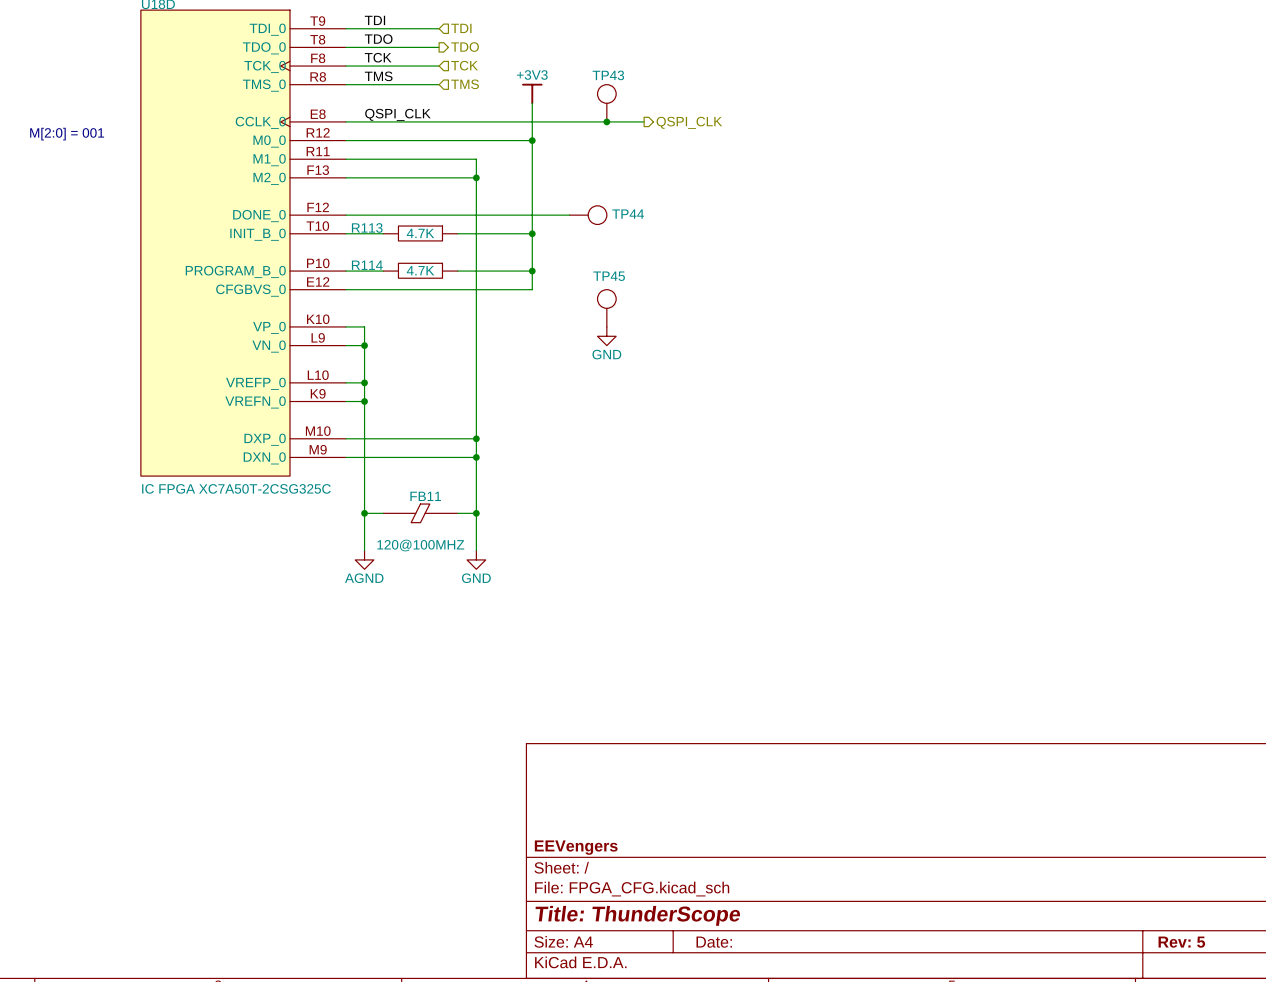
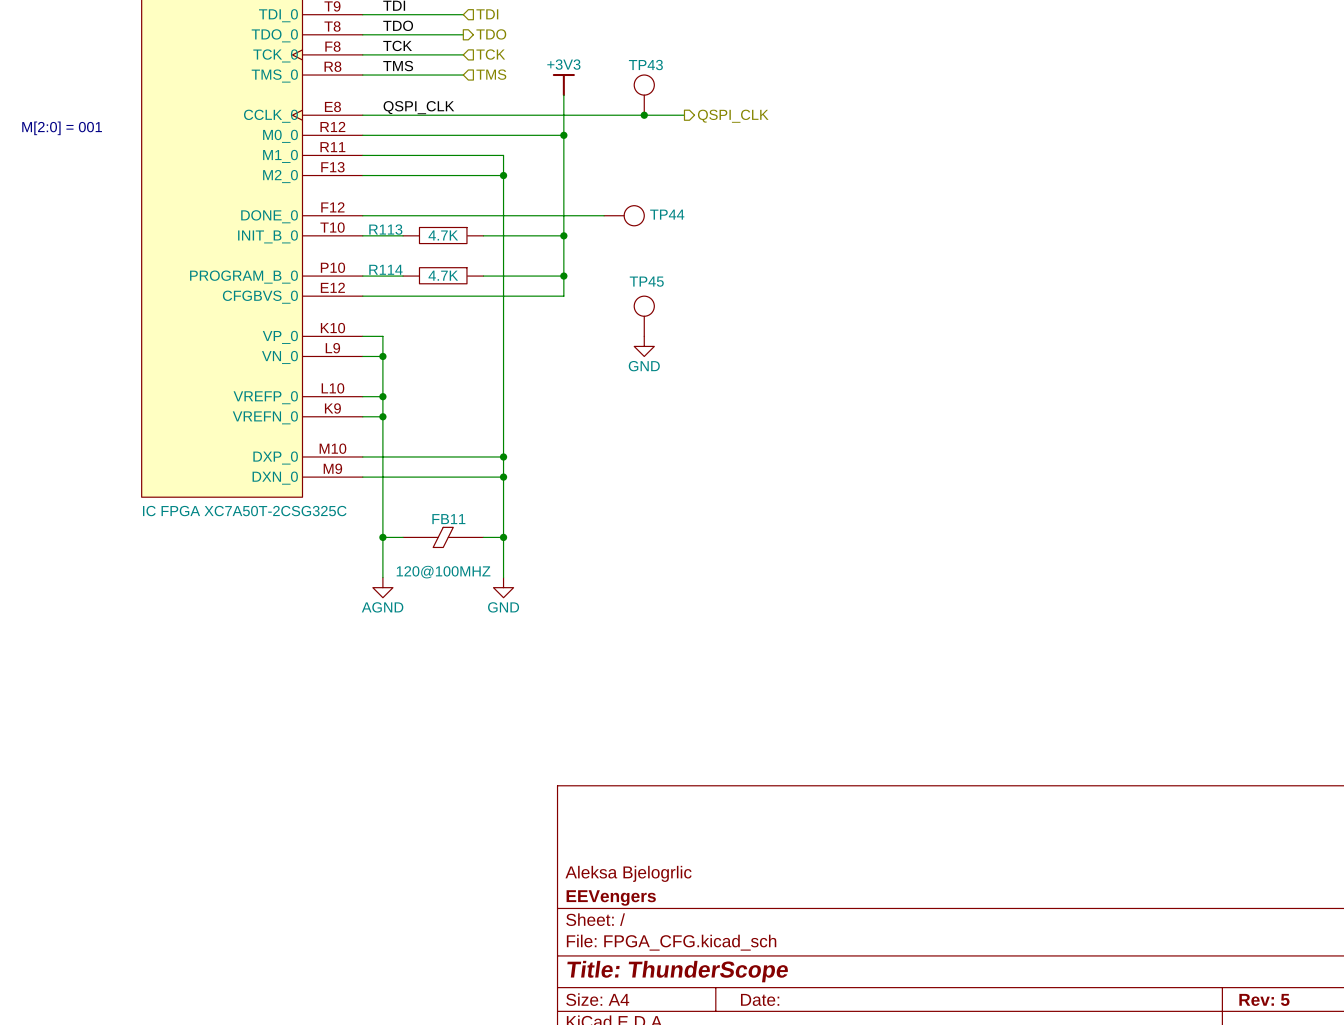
title block: none -> Aleksa Bjelogrlic (628, 873)

